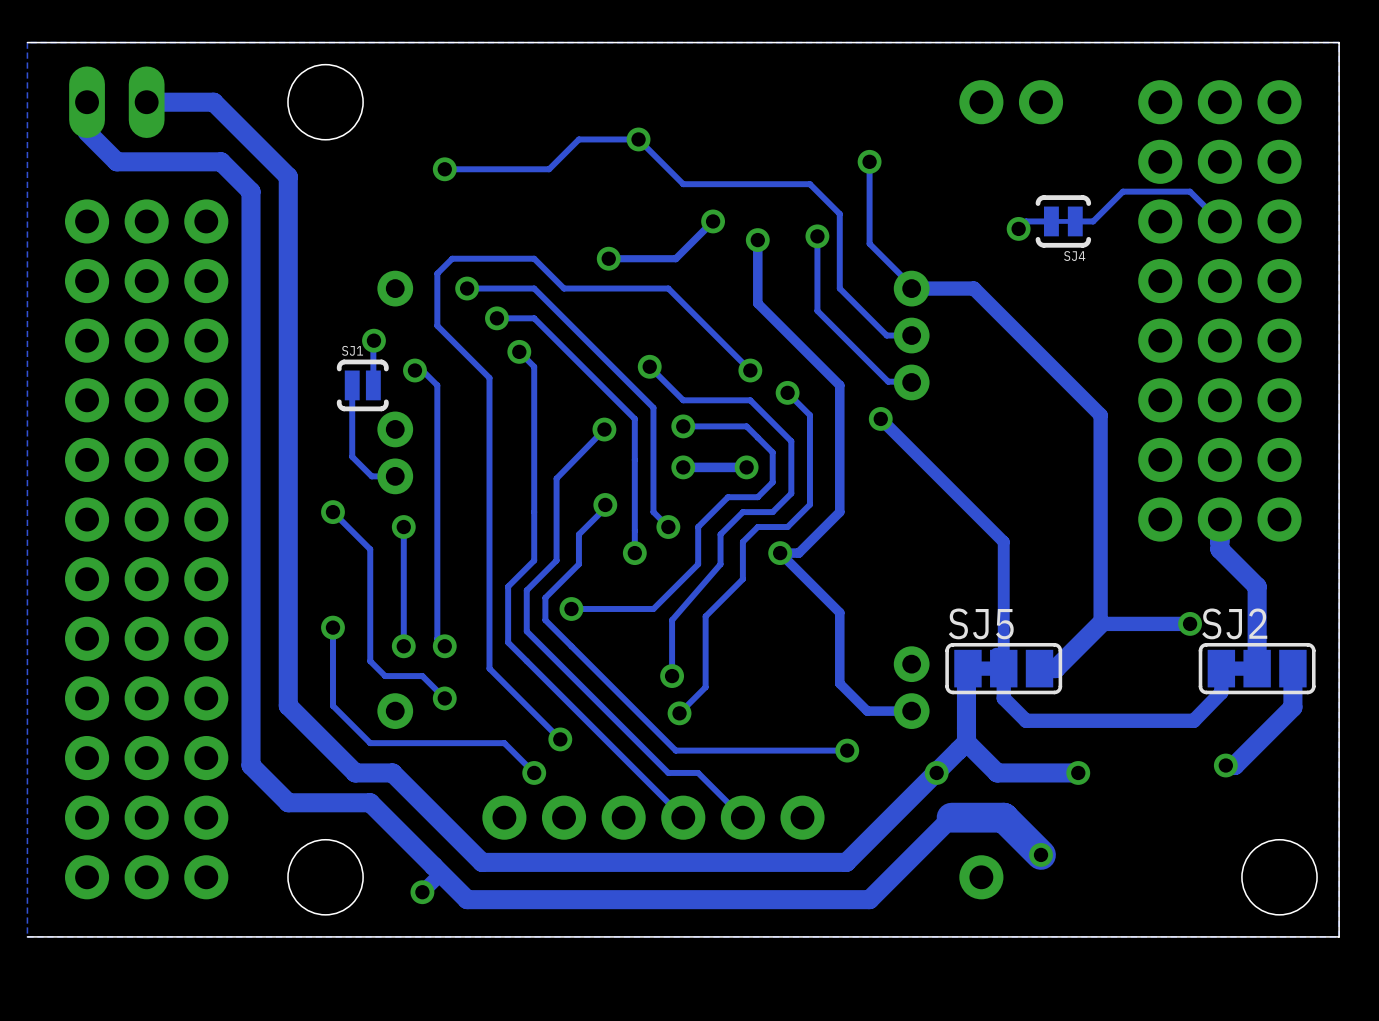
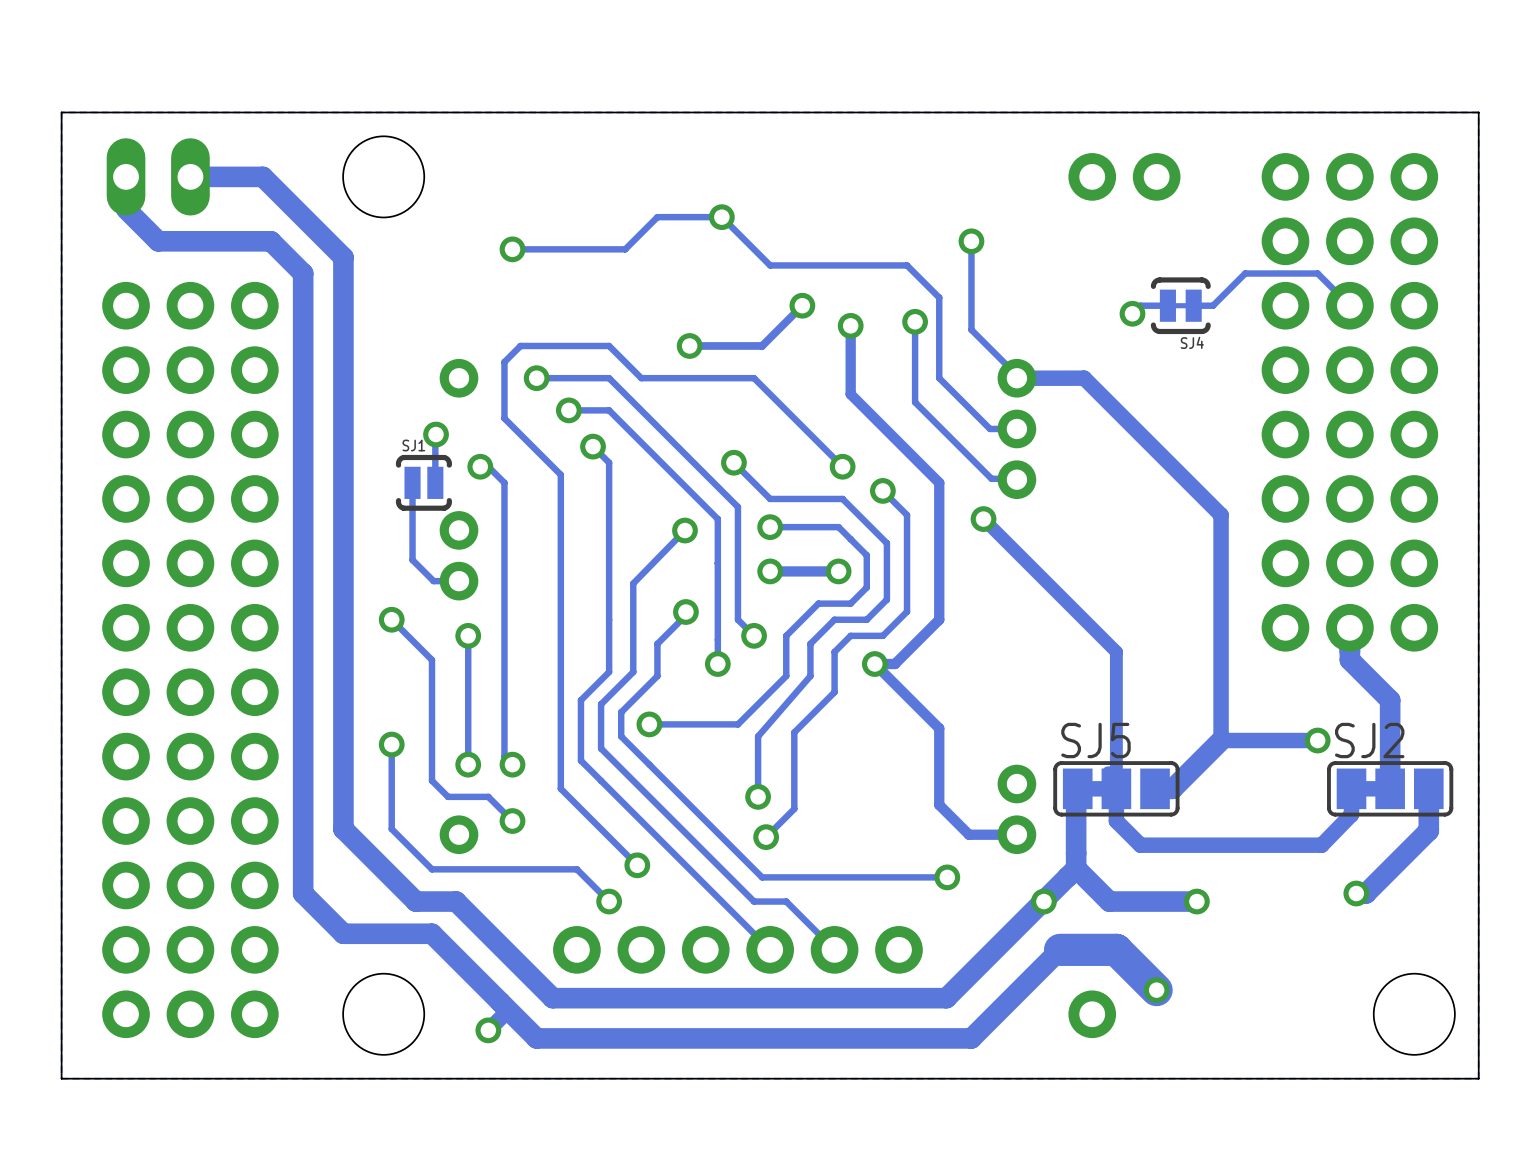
board edge: none -> (61, 112) (61, 1078)

